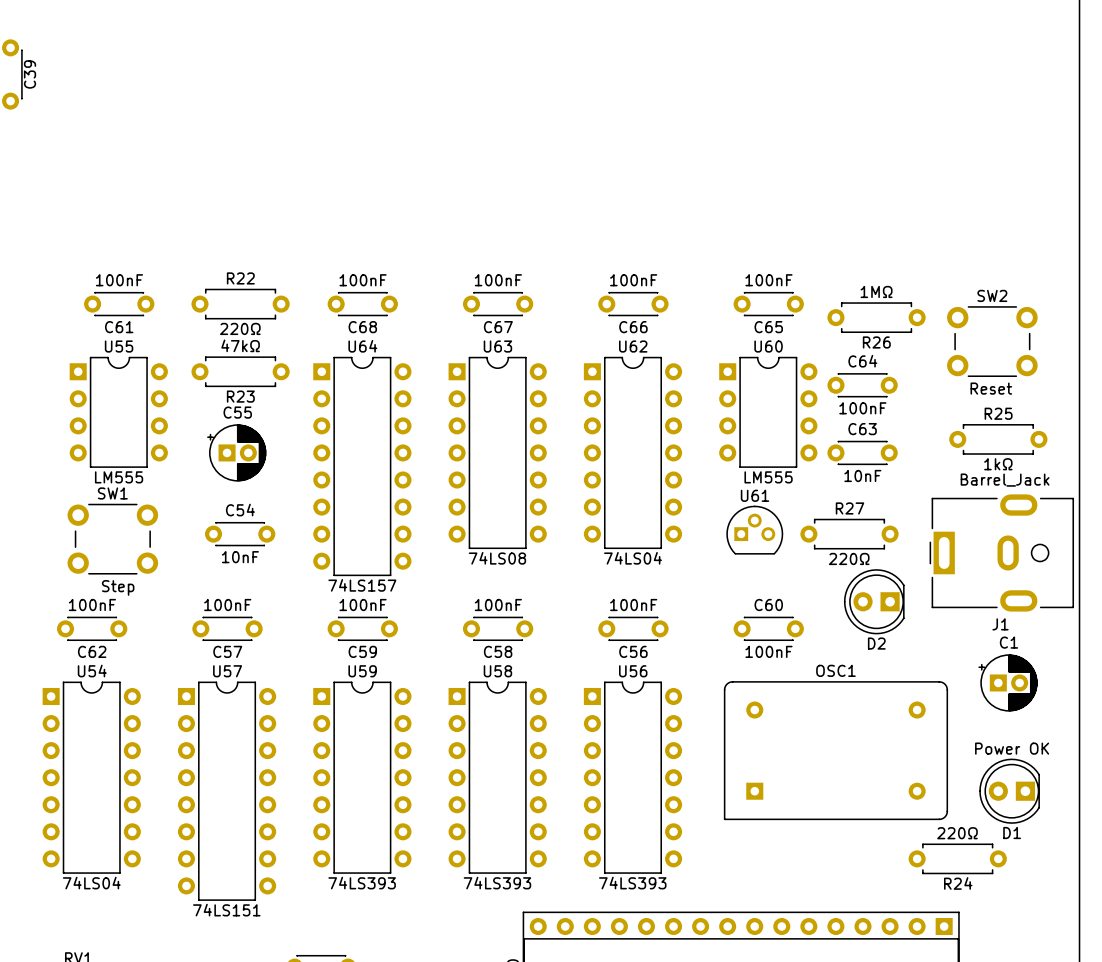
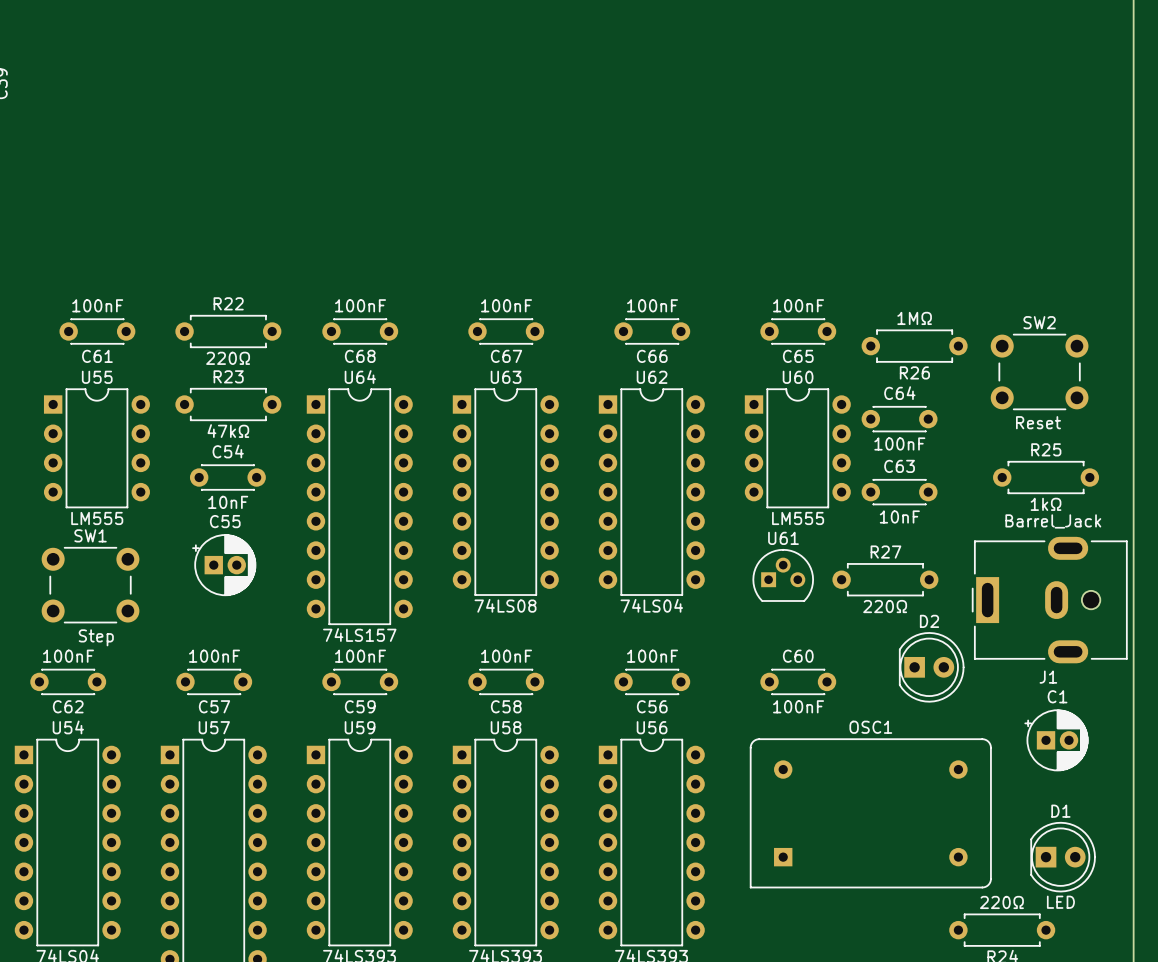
R23 value position: 47kΩ (240, 345) -> 47kΩ (228, 431)
R23 name position: R23 (240, 396) -> R23 (228, 376)
C55 position: (236, 452) -> (224, 565)
C54 position: (240, 534) -> (227, 477)
D2 rotation: 0° (874, 601) -> 180° (931, 667)
D1 value: Power OK (1012, 748) -> LED (1060, 902)
D1 rotation: 0° (1009, 791) -> 180° (1063, 857)

